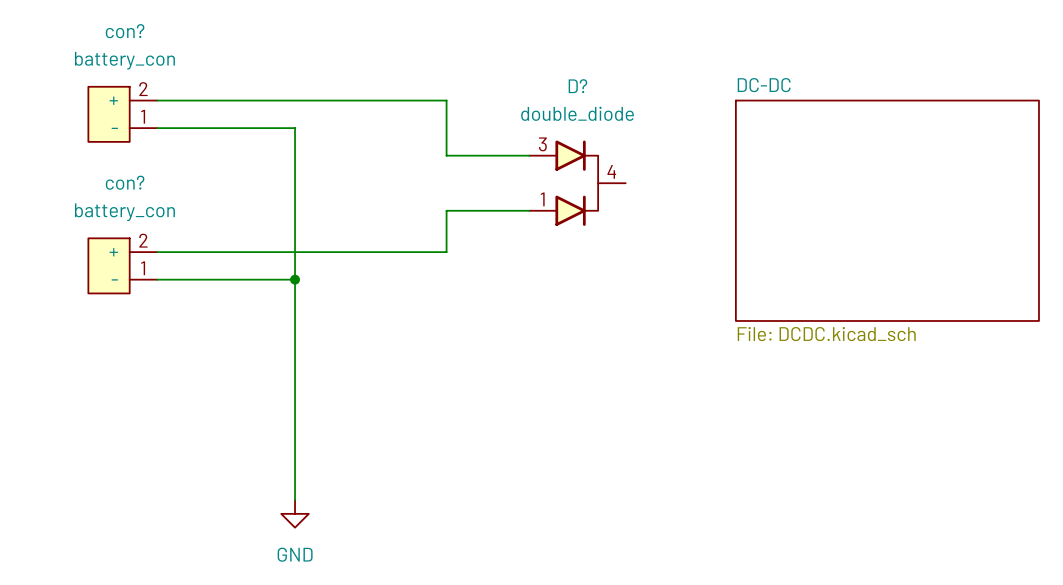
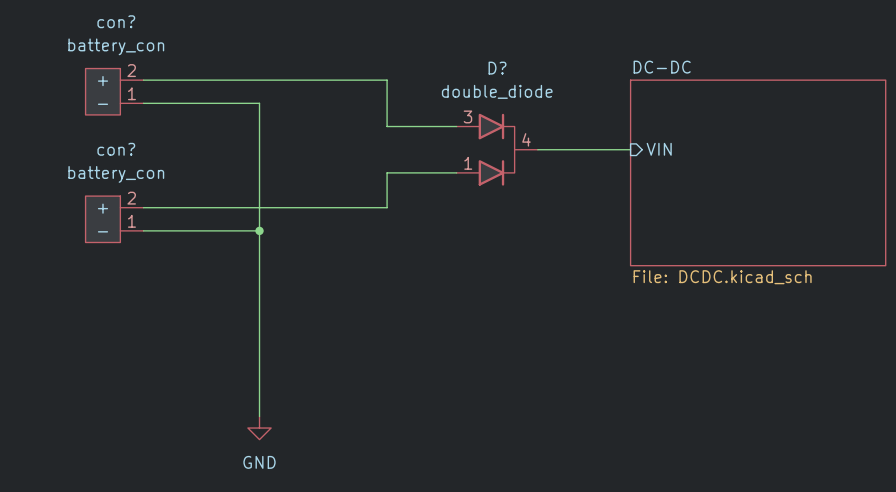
sheet pin: none -> VIN (659, 149)
wire: none -> (537, 149) (630, 149)

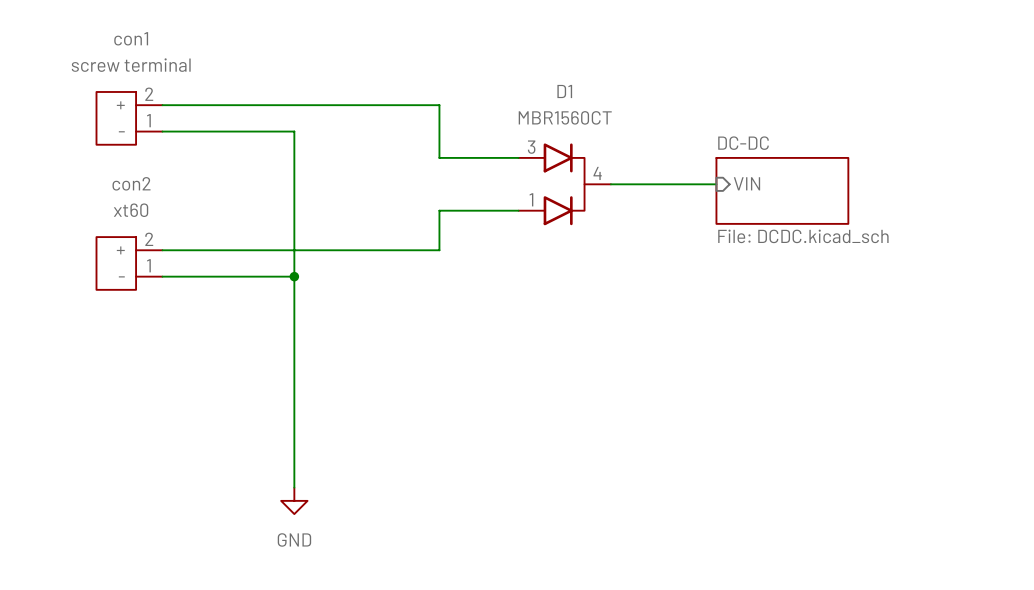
con? name: con? (116, 21) -> con1 (131, 38)
con? value: battery_con (116, 46) -> screw terminal (131, 65)
D? name: D? (497, 68) -> D1 (564, 91)
D? value: double_diode (497, 91) -> MBR1560CT (565, 117)
con? name: con? (116, 149) -> con2 (131, 183)
sheet DC-DC: none -> File: DCDC.kicad_sch (782, 190)
sheet DC-DC: File: DCDC.kicad_sch (758, 172) -> none
con? value: battery_con (116, 174) -> xt60 (131, 210)

